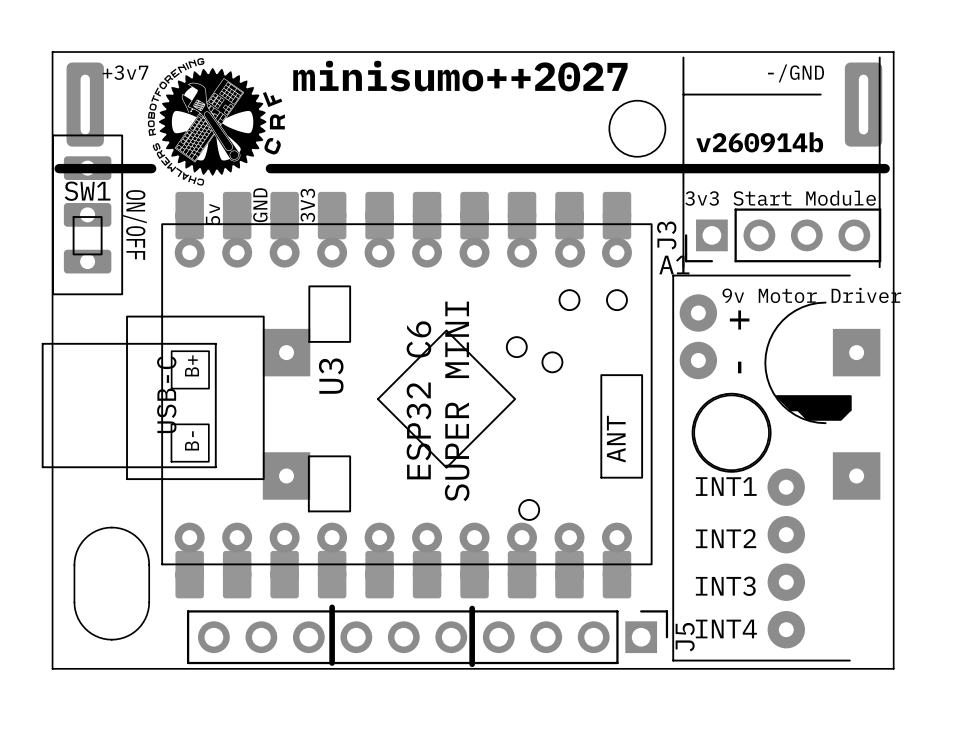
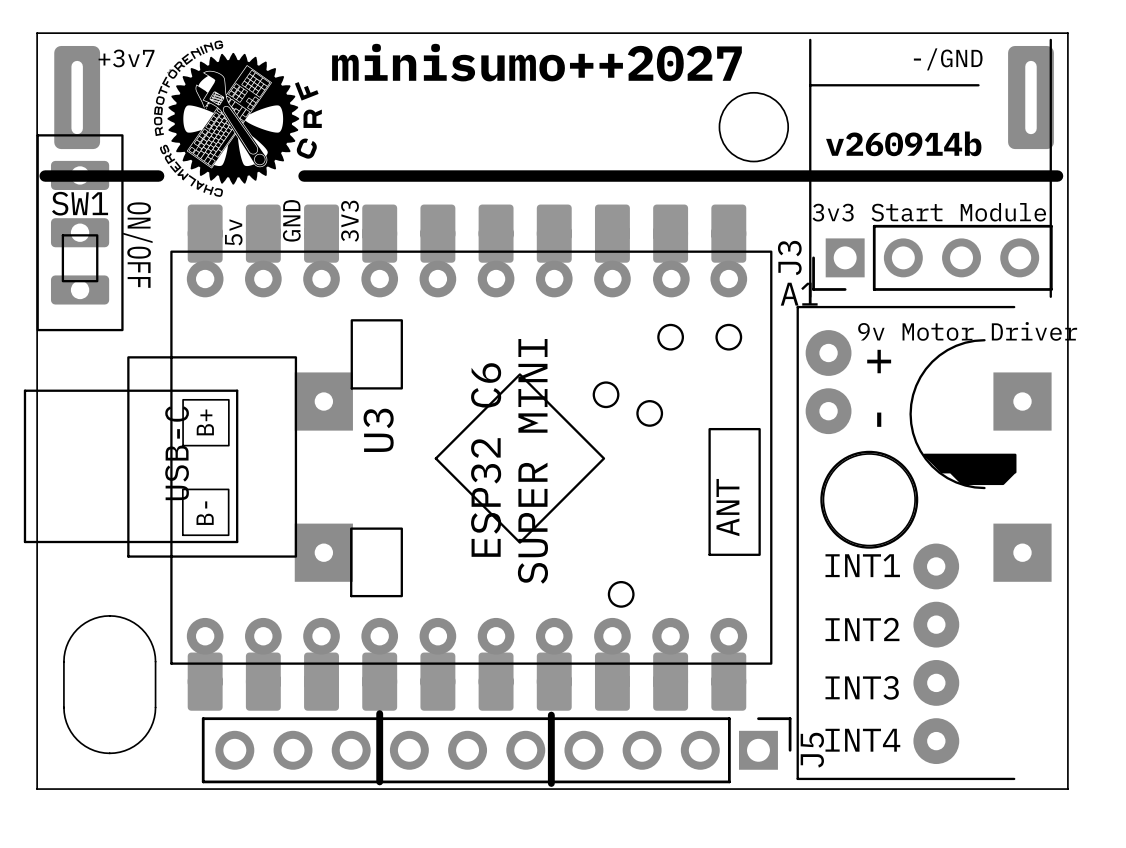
U3 footprint: [126, 191, 653, 599] -> [127, 204, 773, 711]

